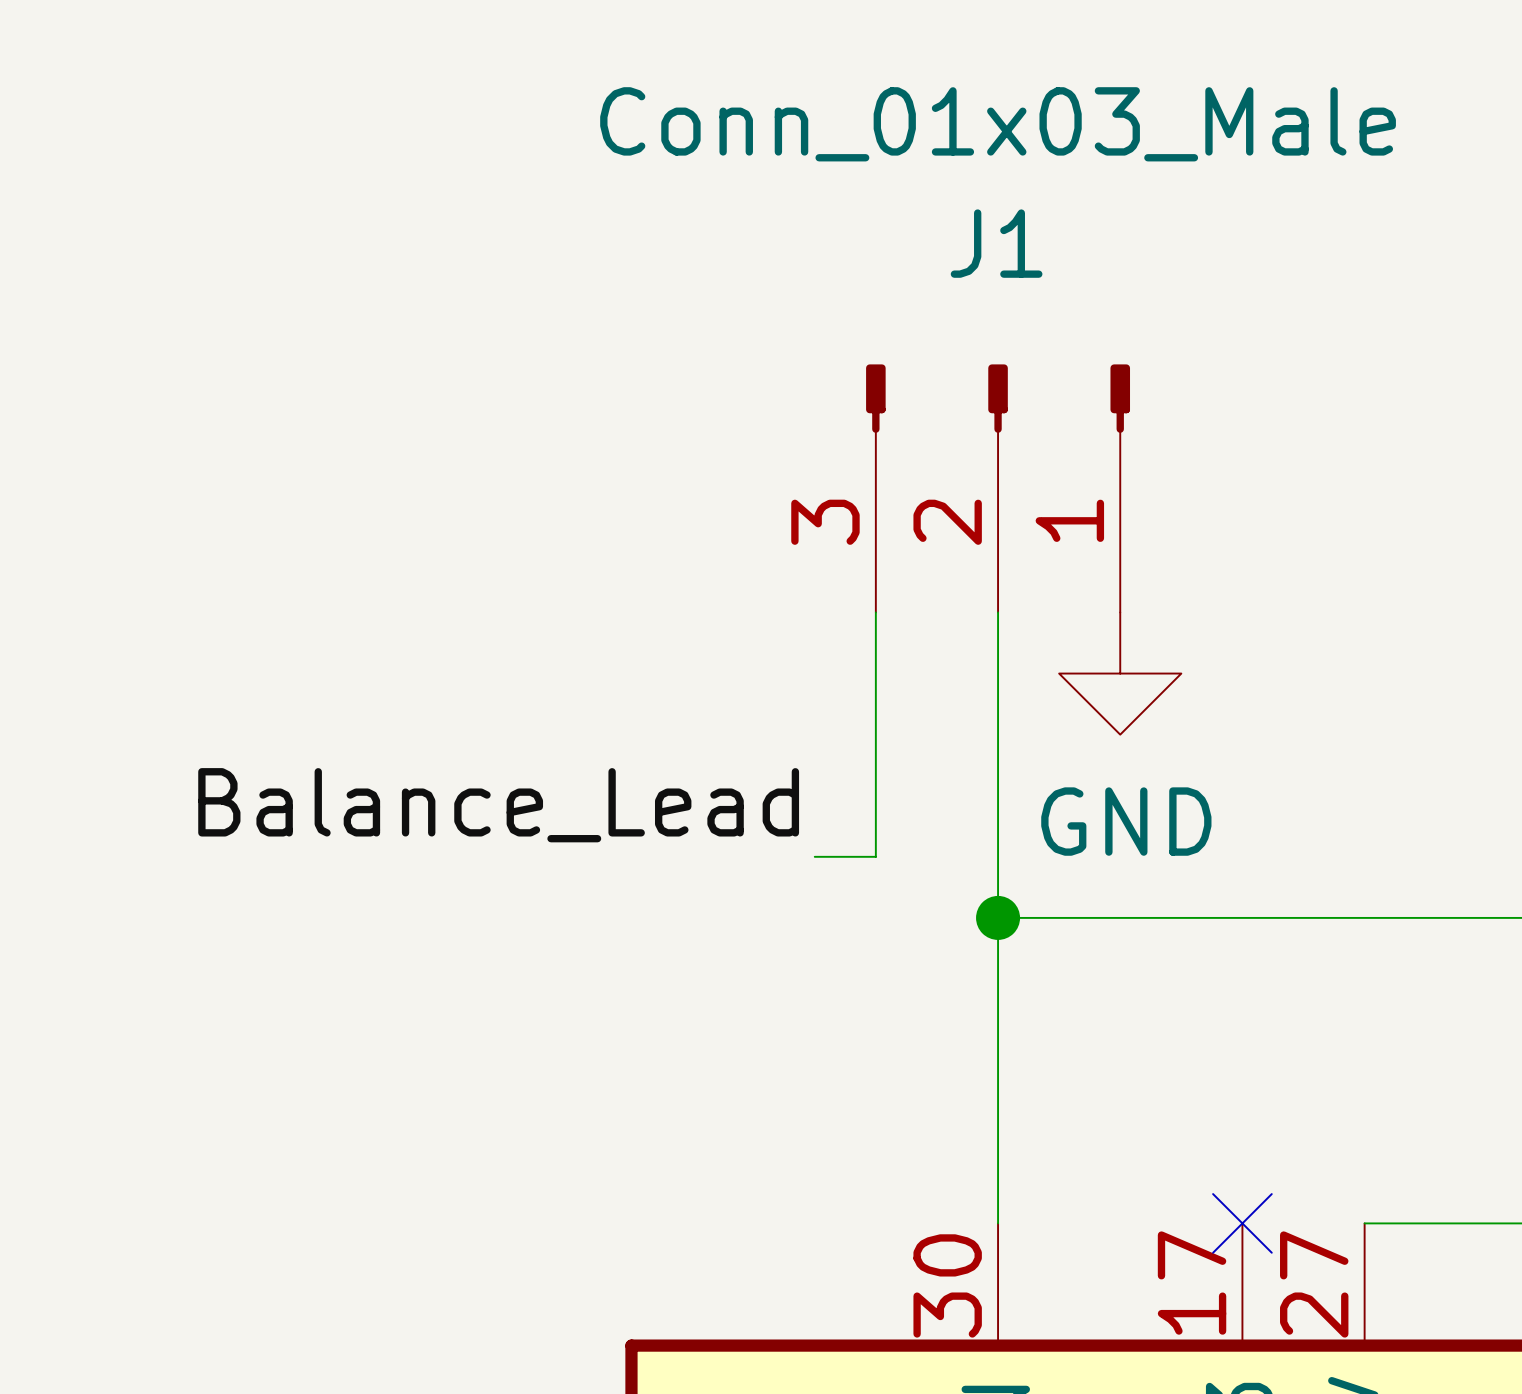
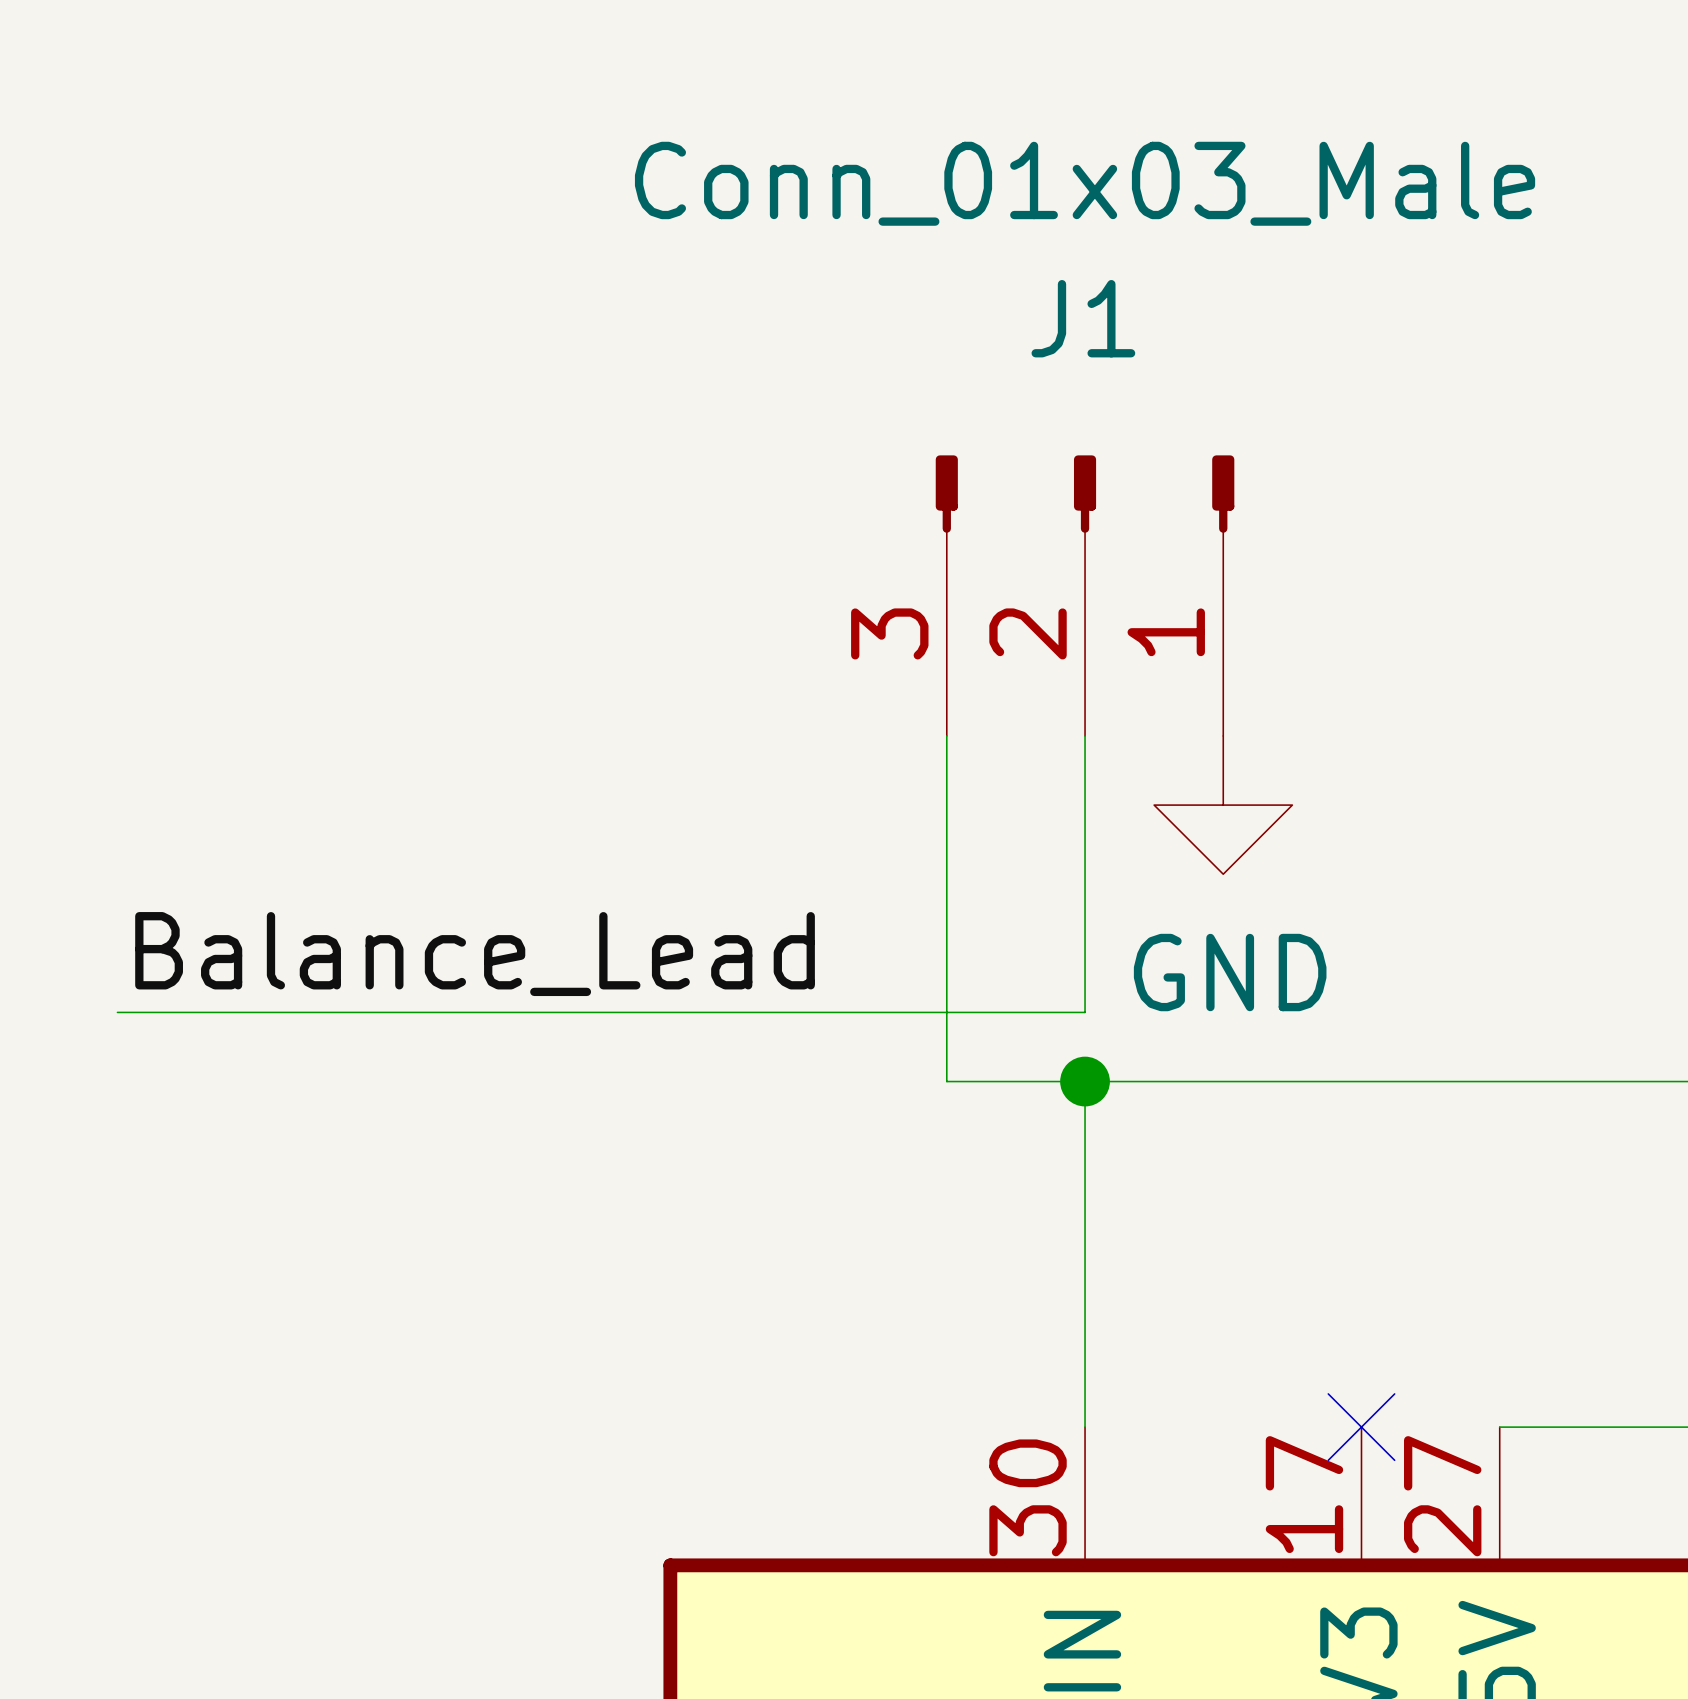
label position: Balance_Lead (498, 805) -> Balance_Lead (475, 954)
wire: none -> (117, 1012) (877, 1012)
wire: (998, 856) (998, 917) -> (1085, 1012) (946, 1012) (946, 1081) (1085, 1081)

